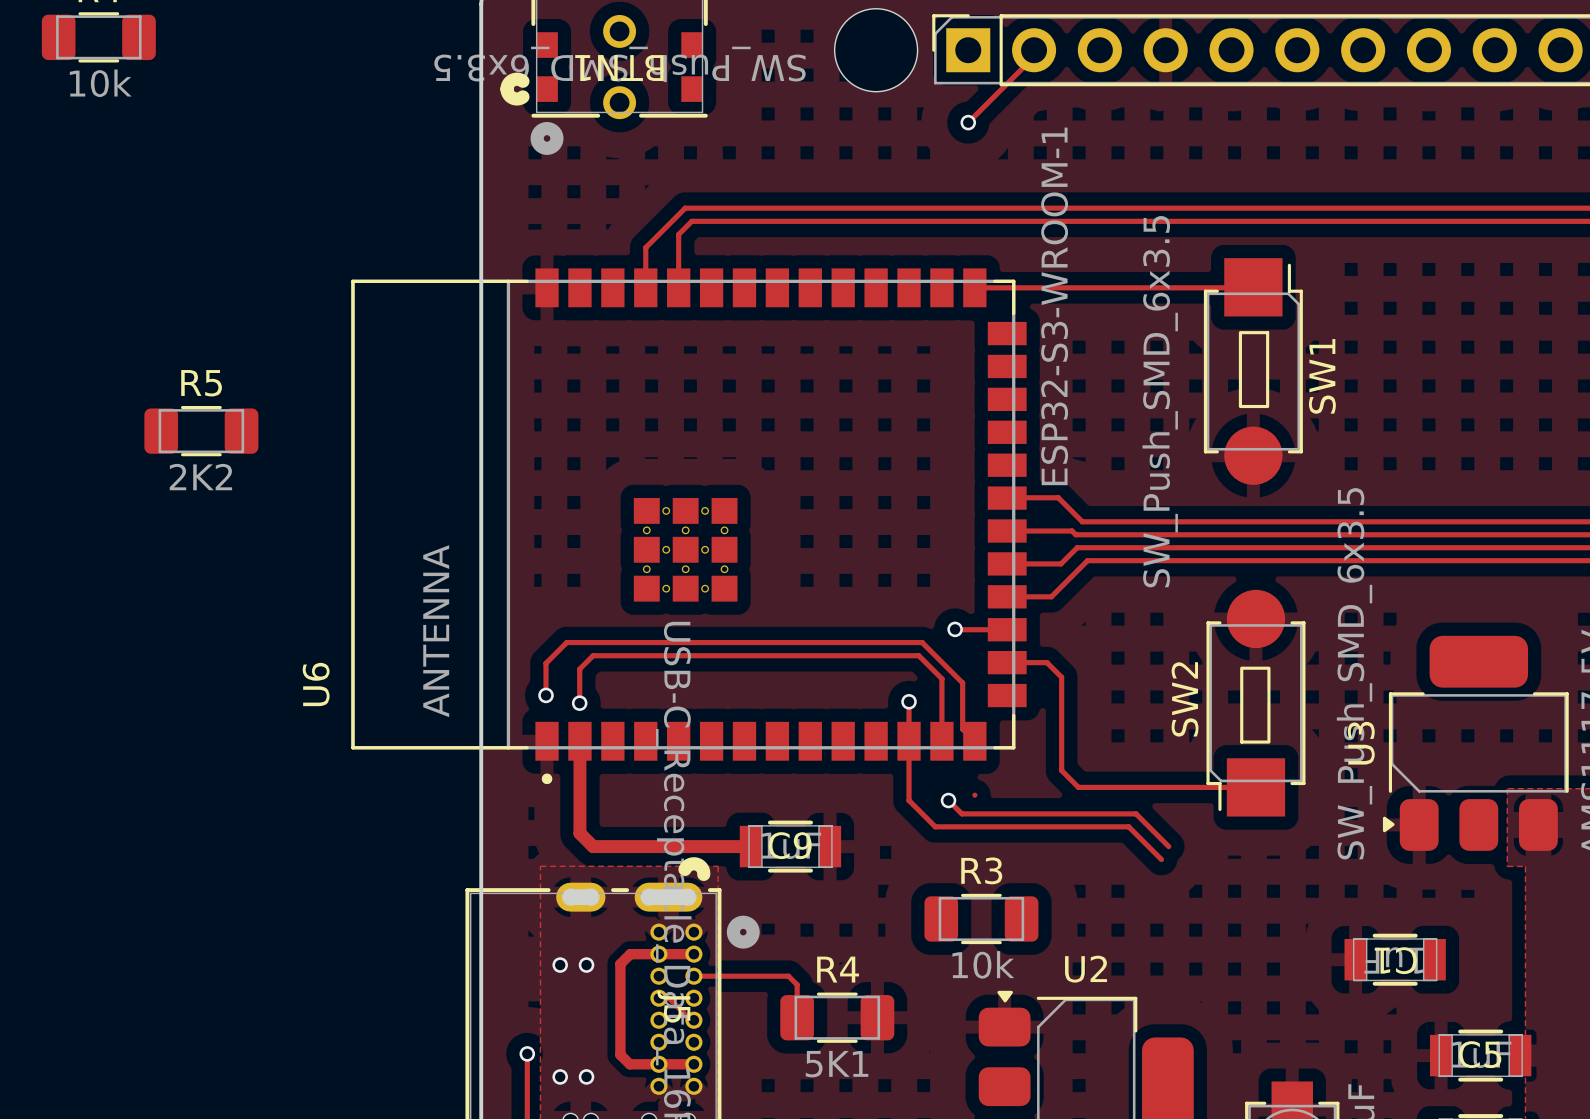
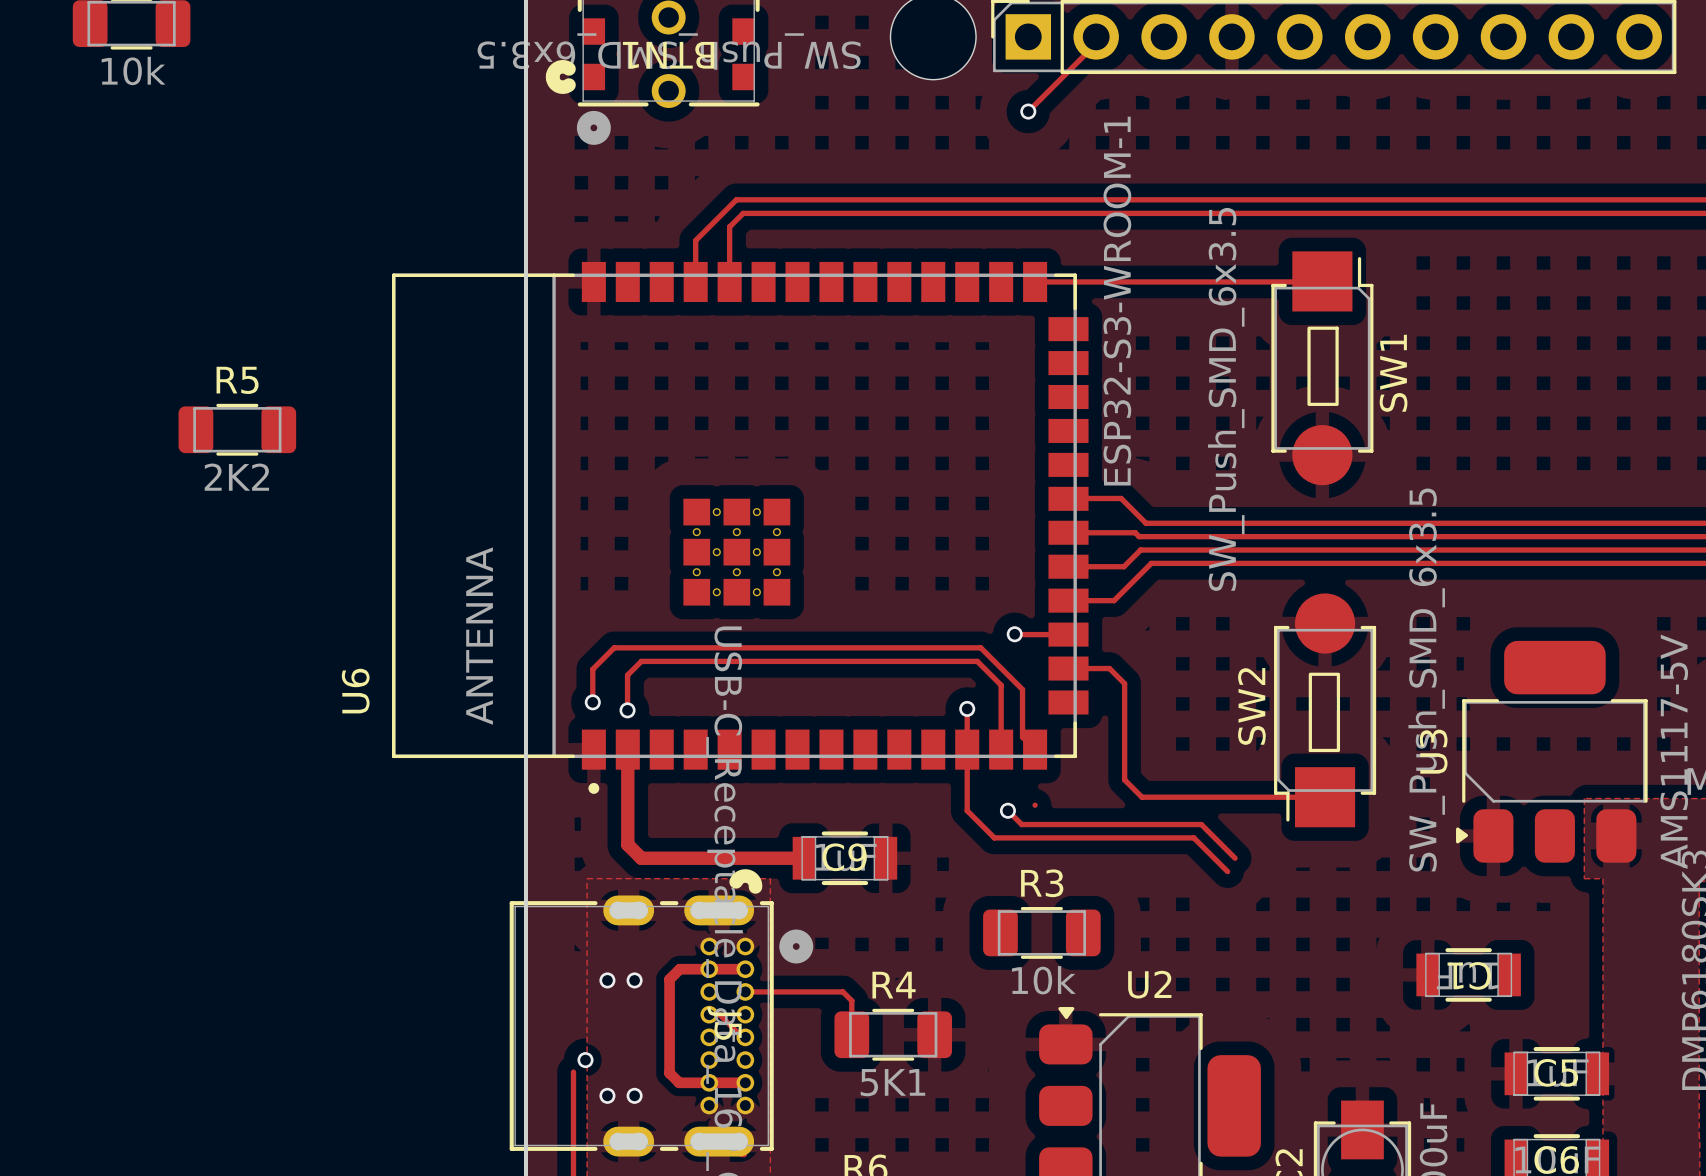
via position: (527, 1053) -> (585, 1060)

